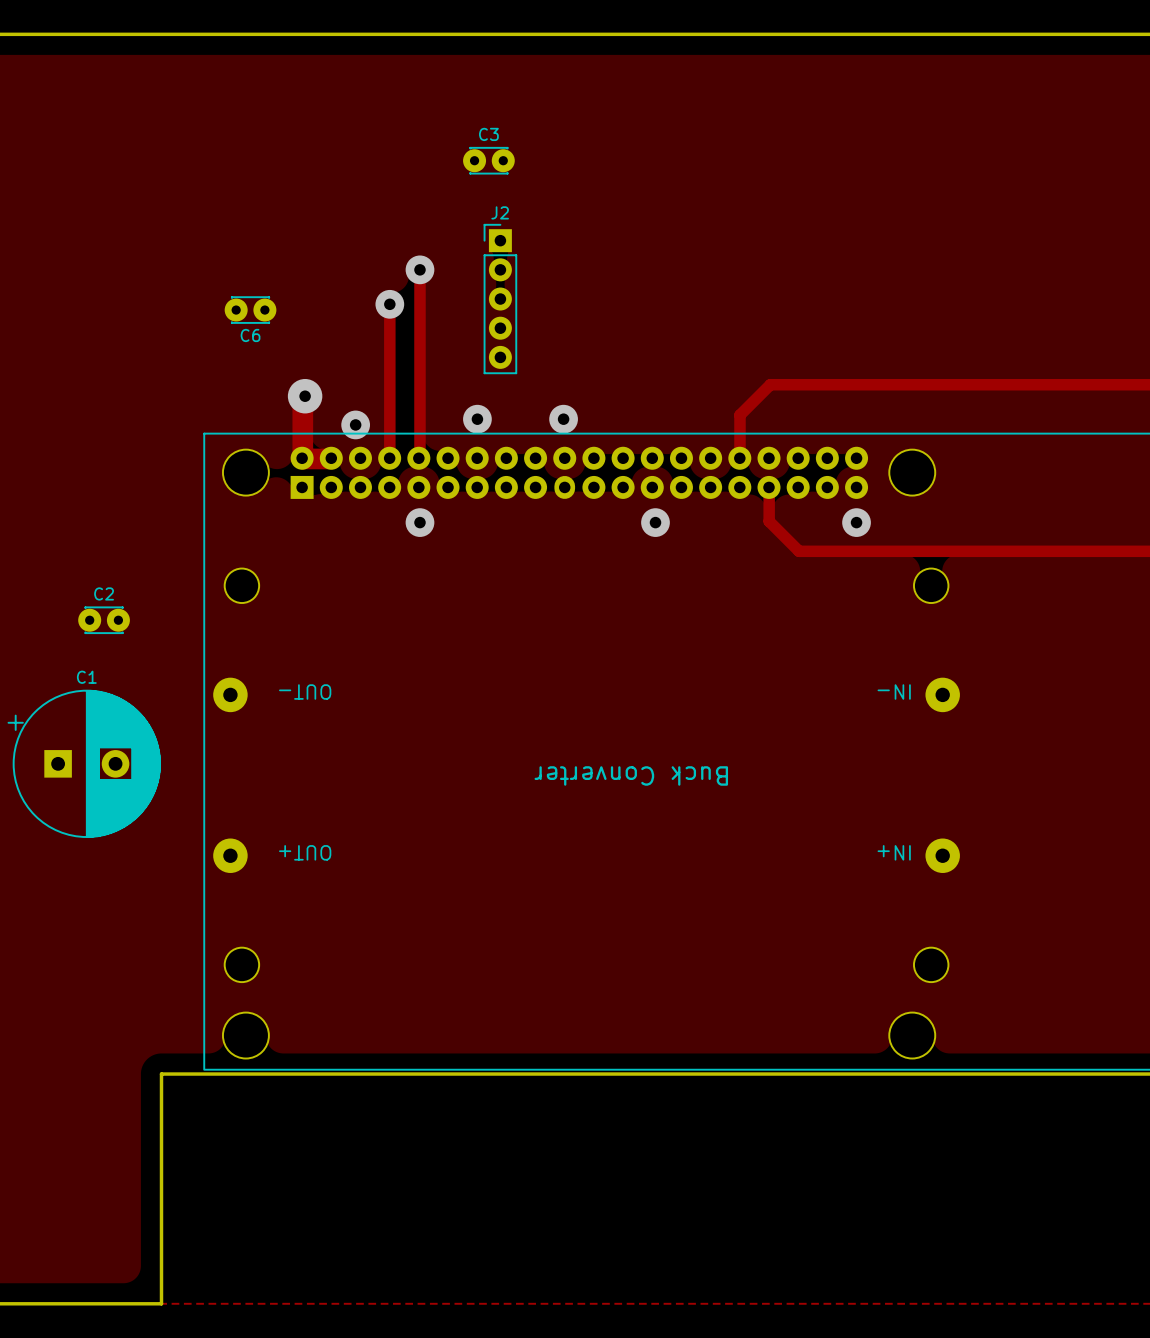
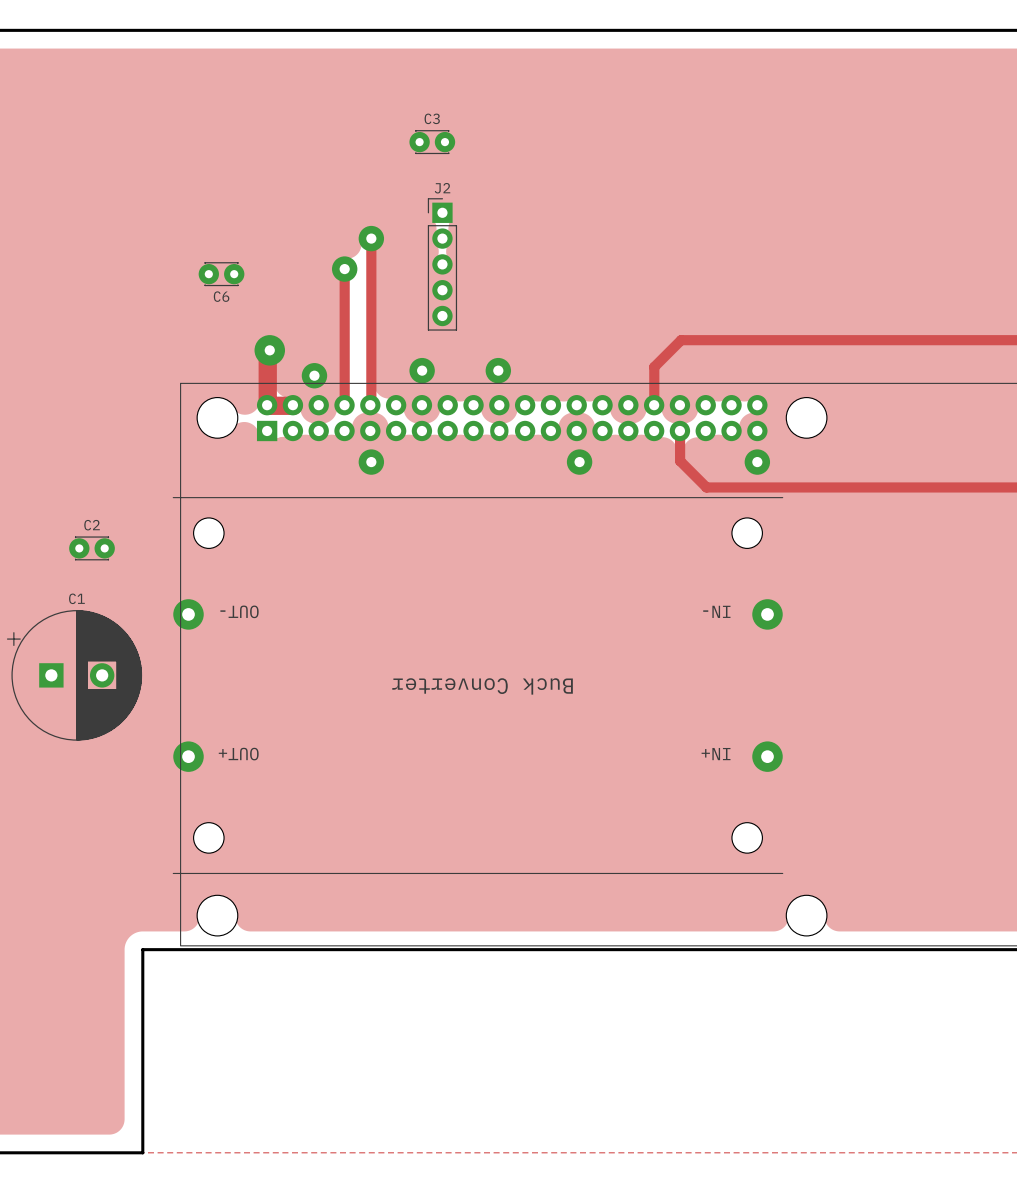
part: none -> Buck Converter (478, 685)
part: Buck Converter (586, 775) -> none

